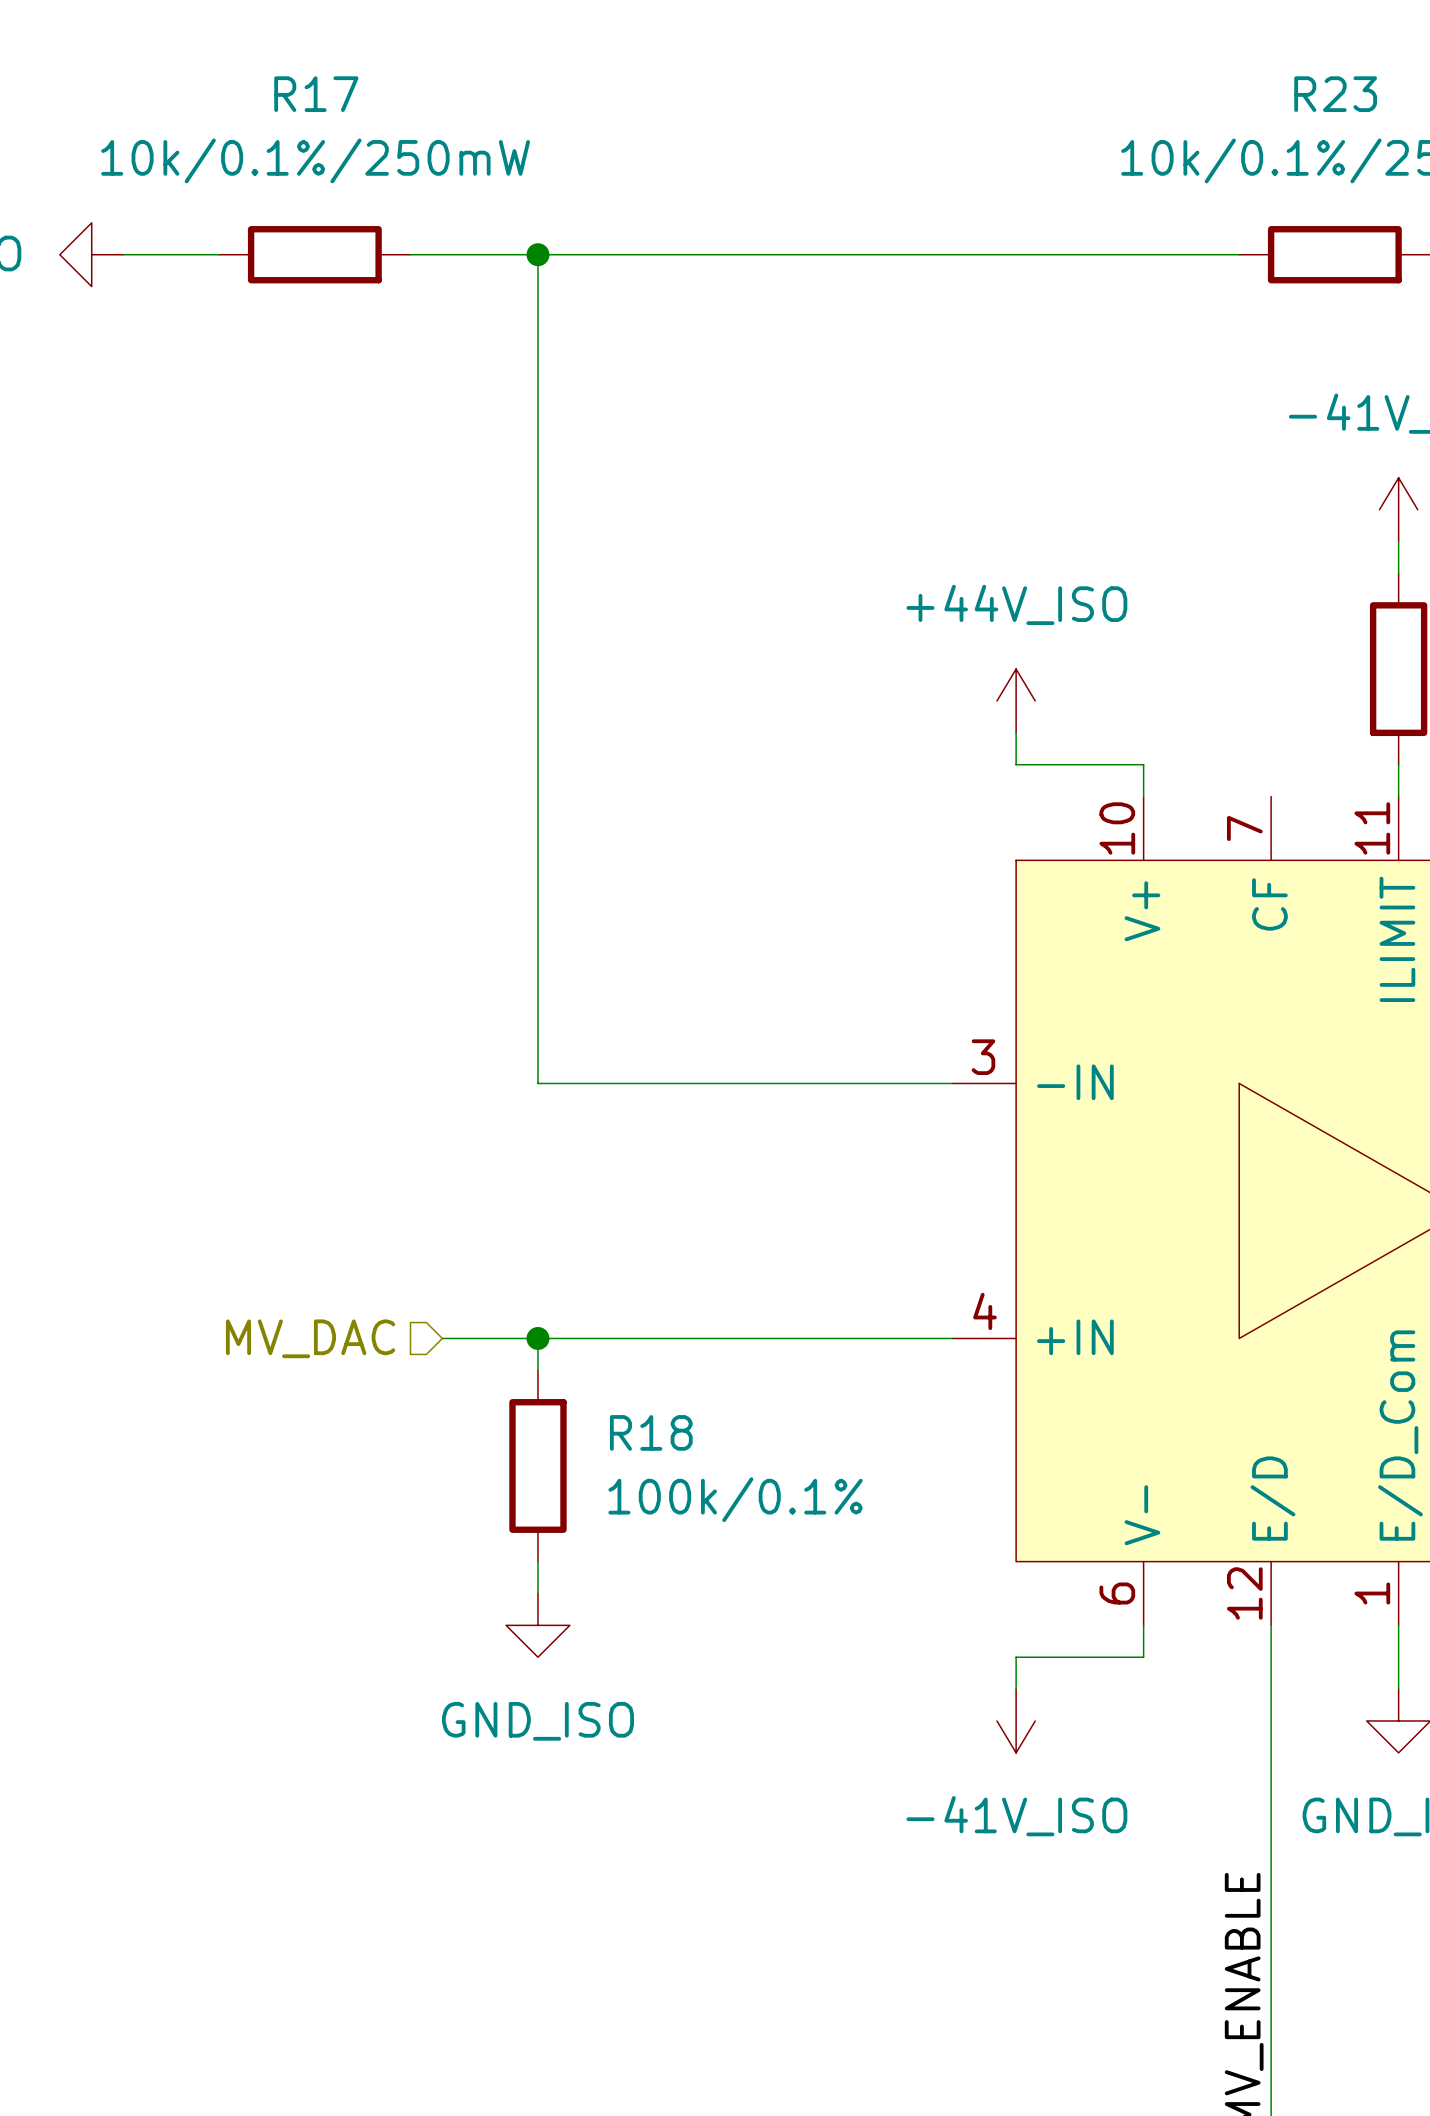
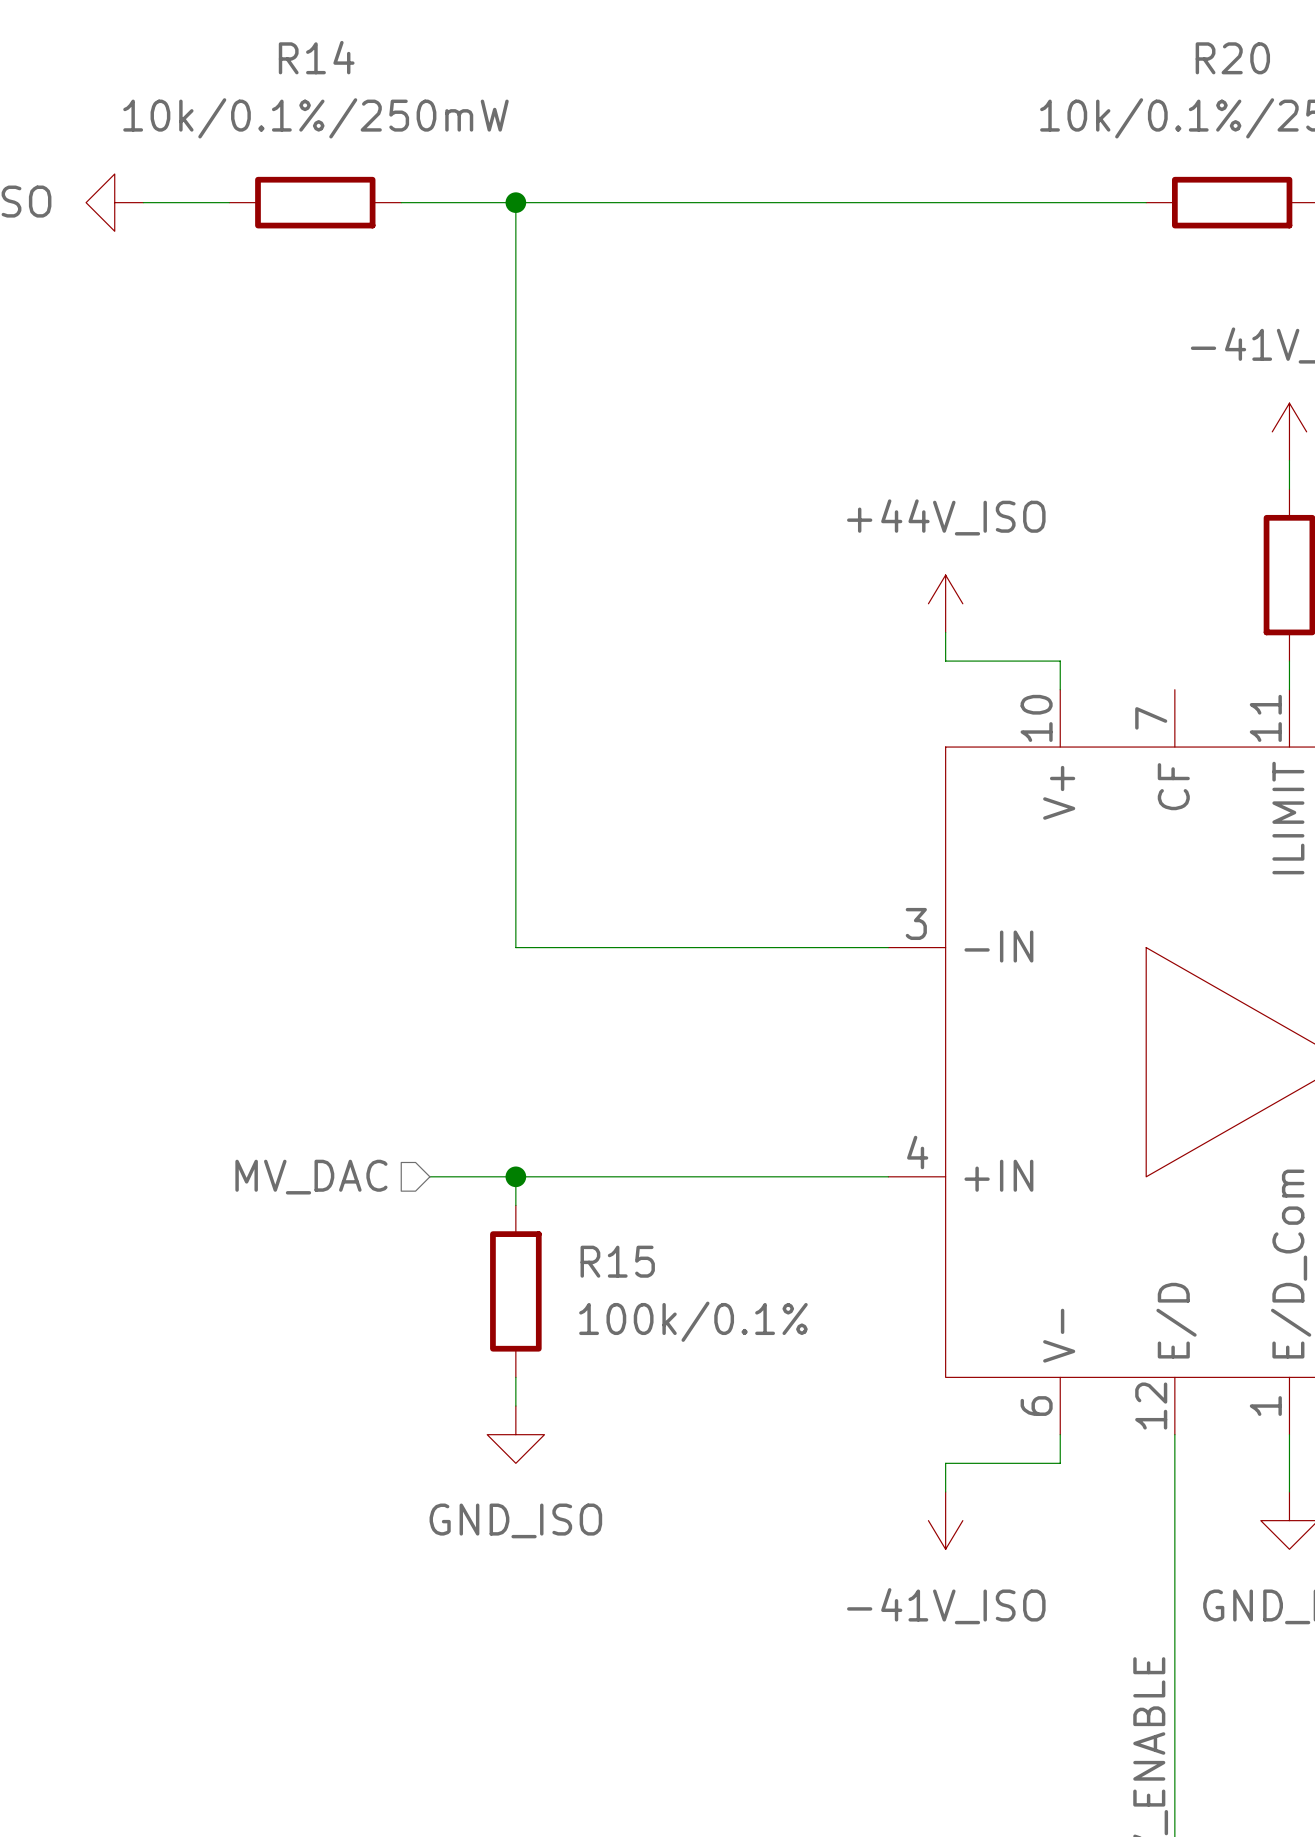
R17 name: R17 (316, 94) -> R14 (316, 57)
R23 name: R23 (1335, 94) -> R20 (1232, 58)
R18 name: R18 (651, 1432) -> R15 (617, 1261)

